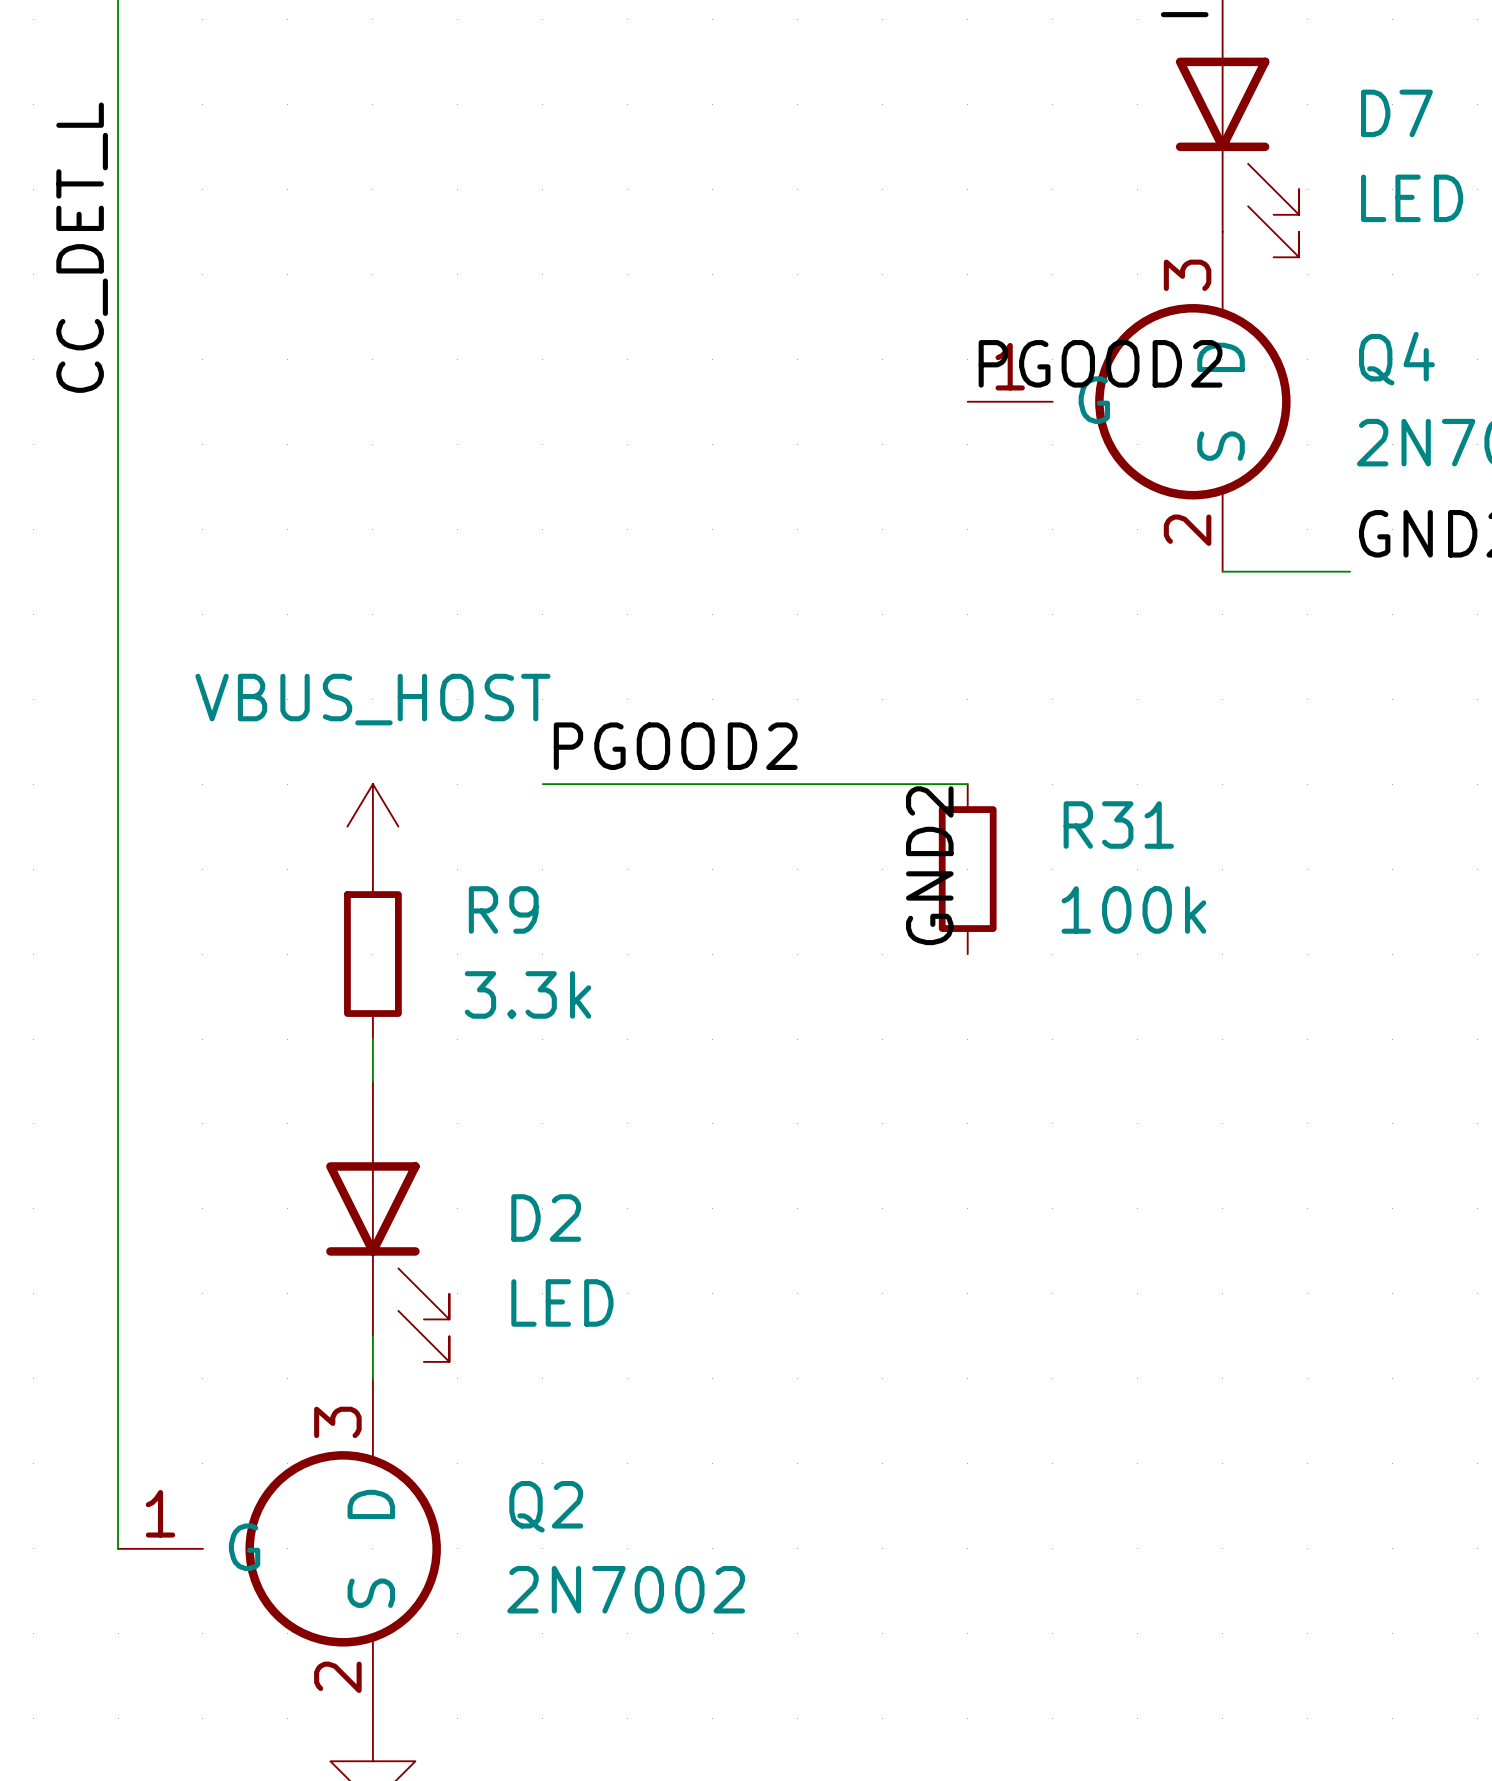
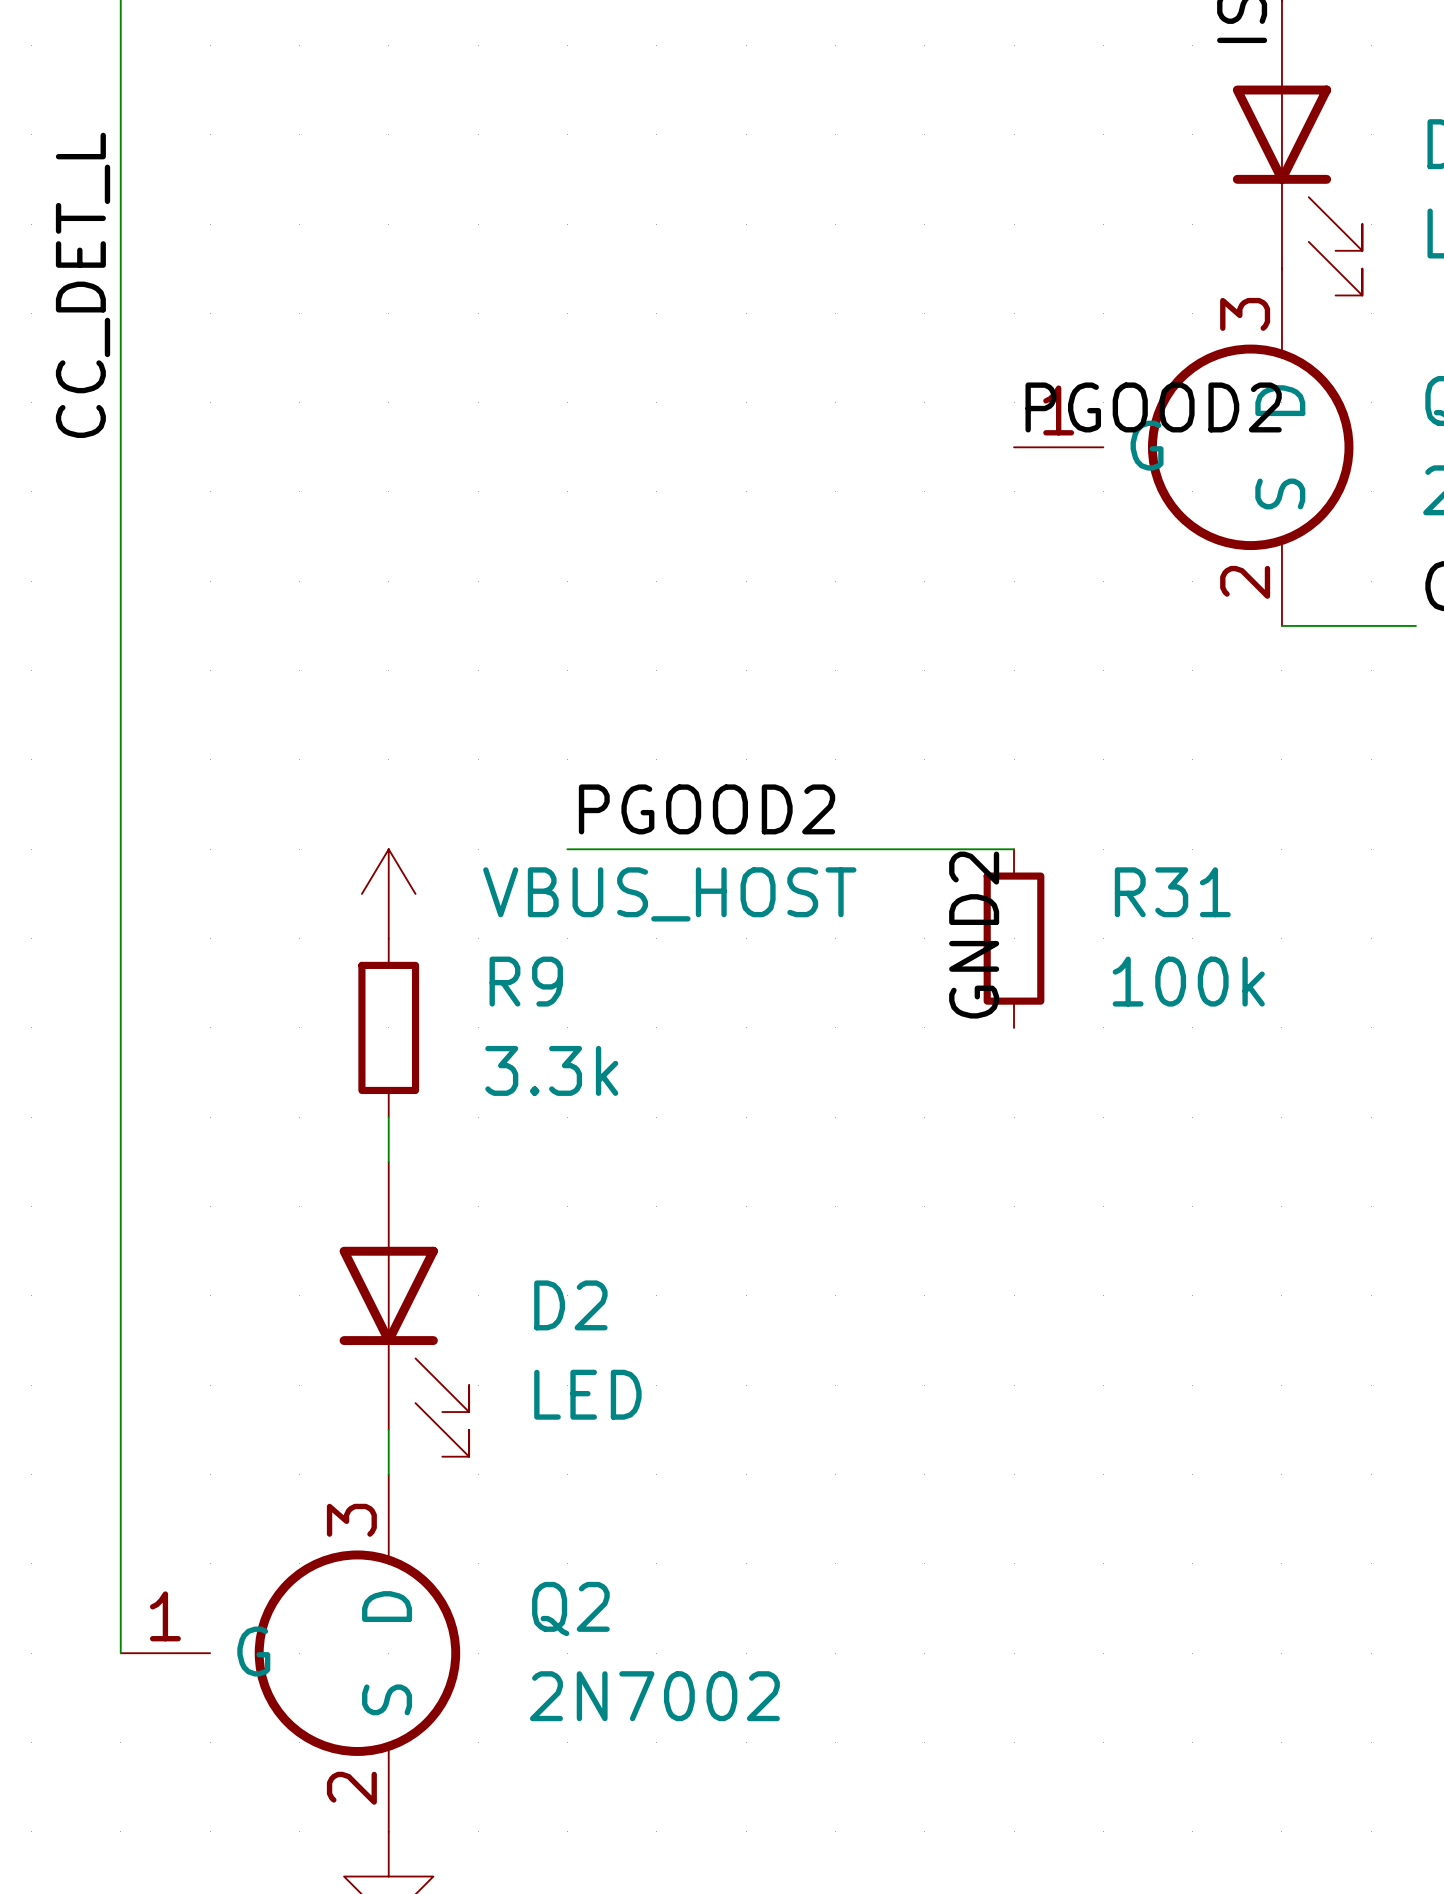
power symbol text position: VBUS_HOST (372, 699) -> VBUS_HOST (669, 894)

